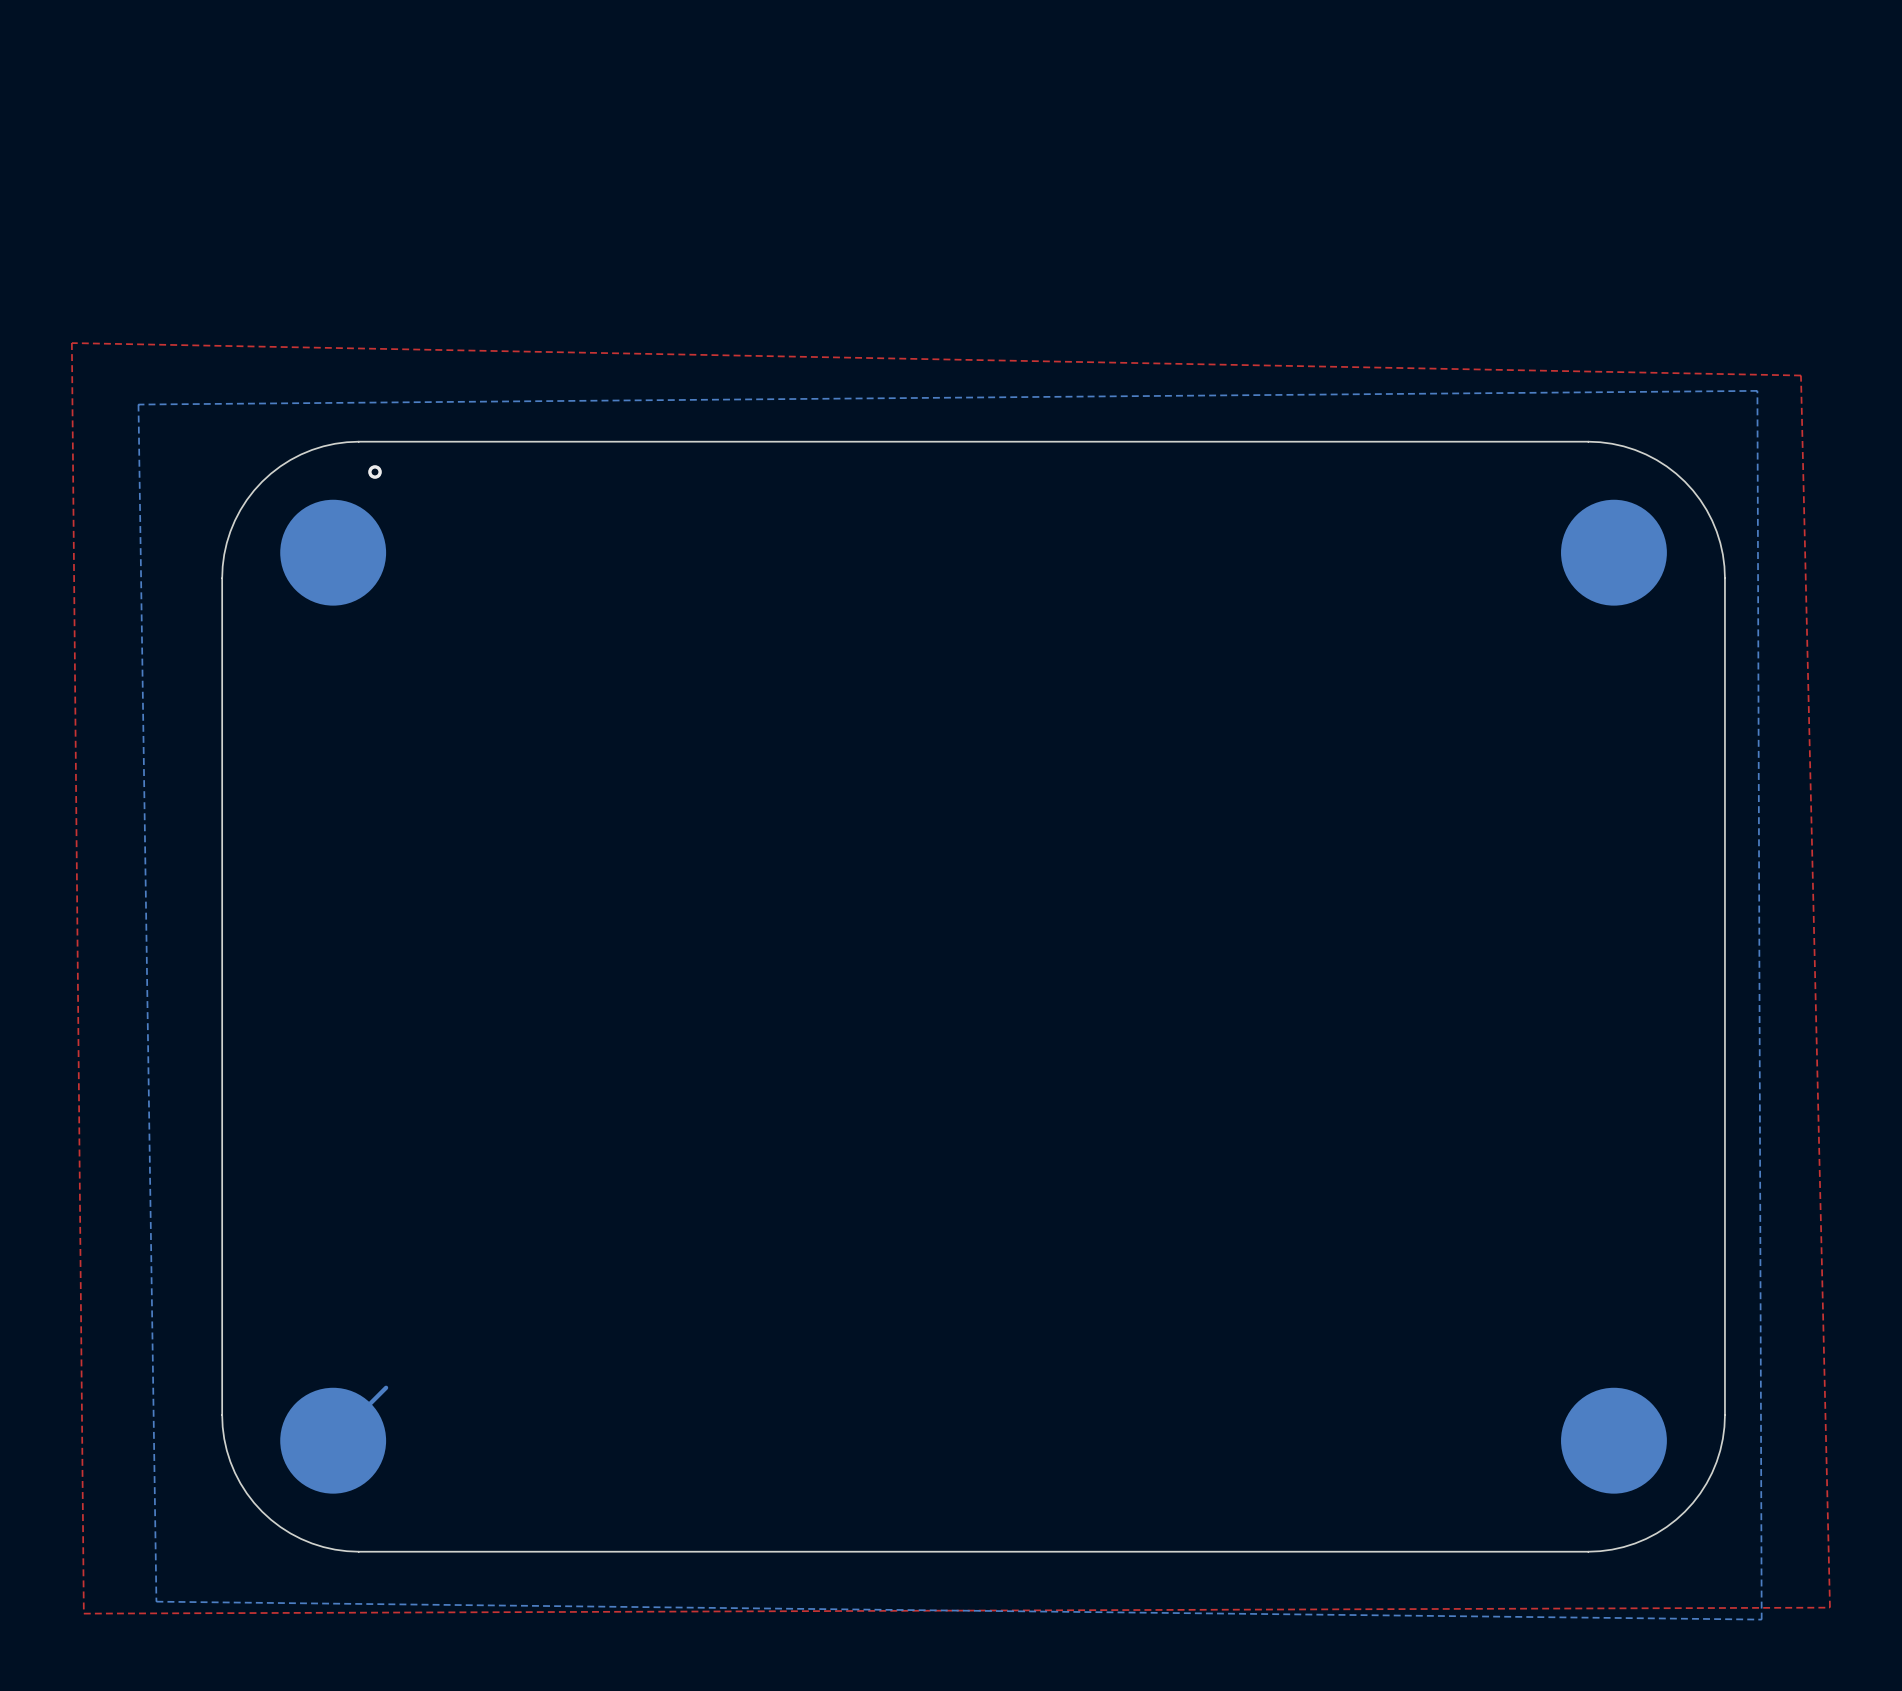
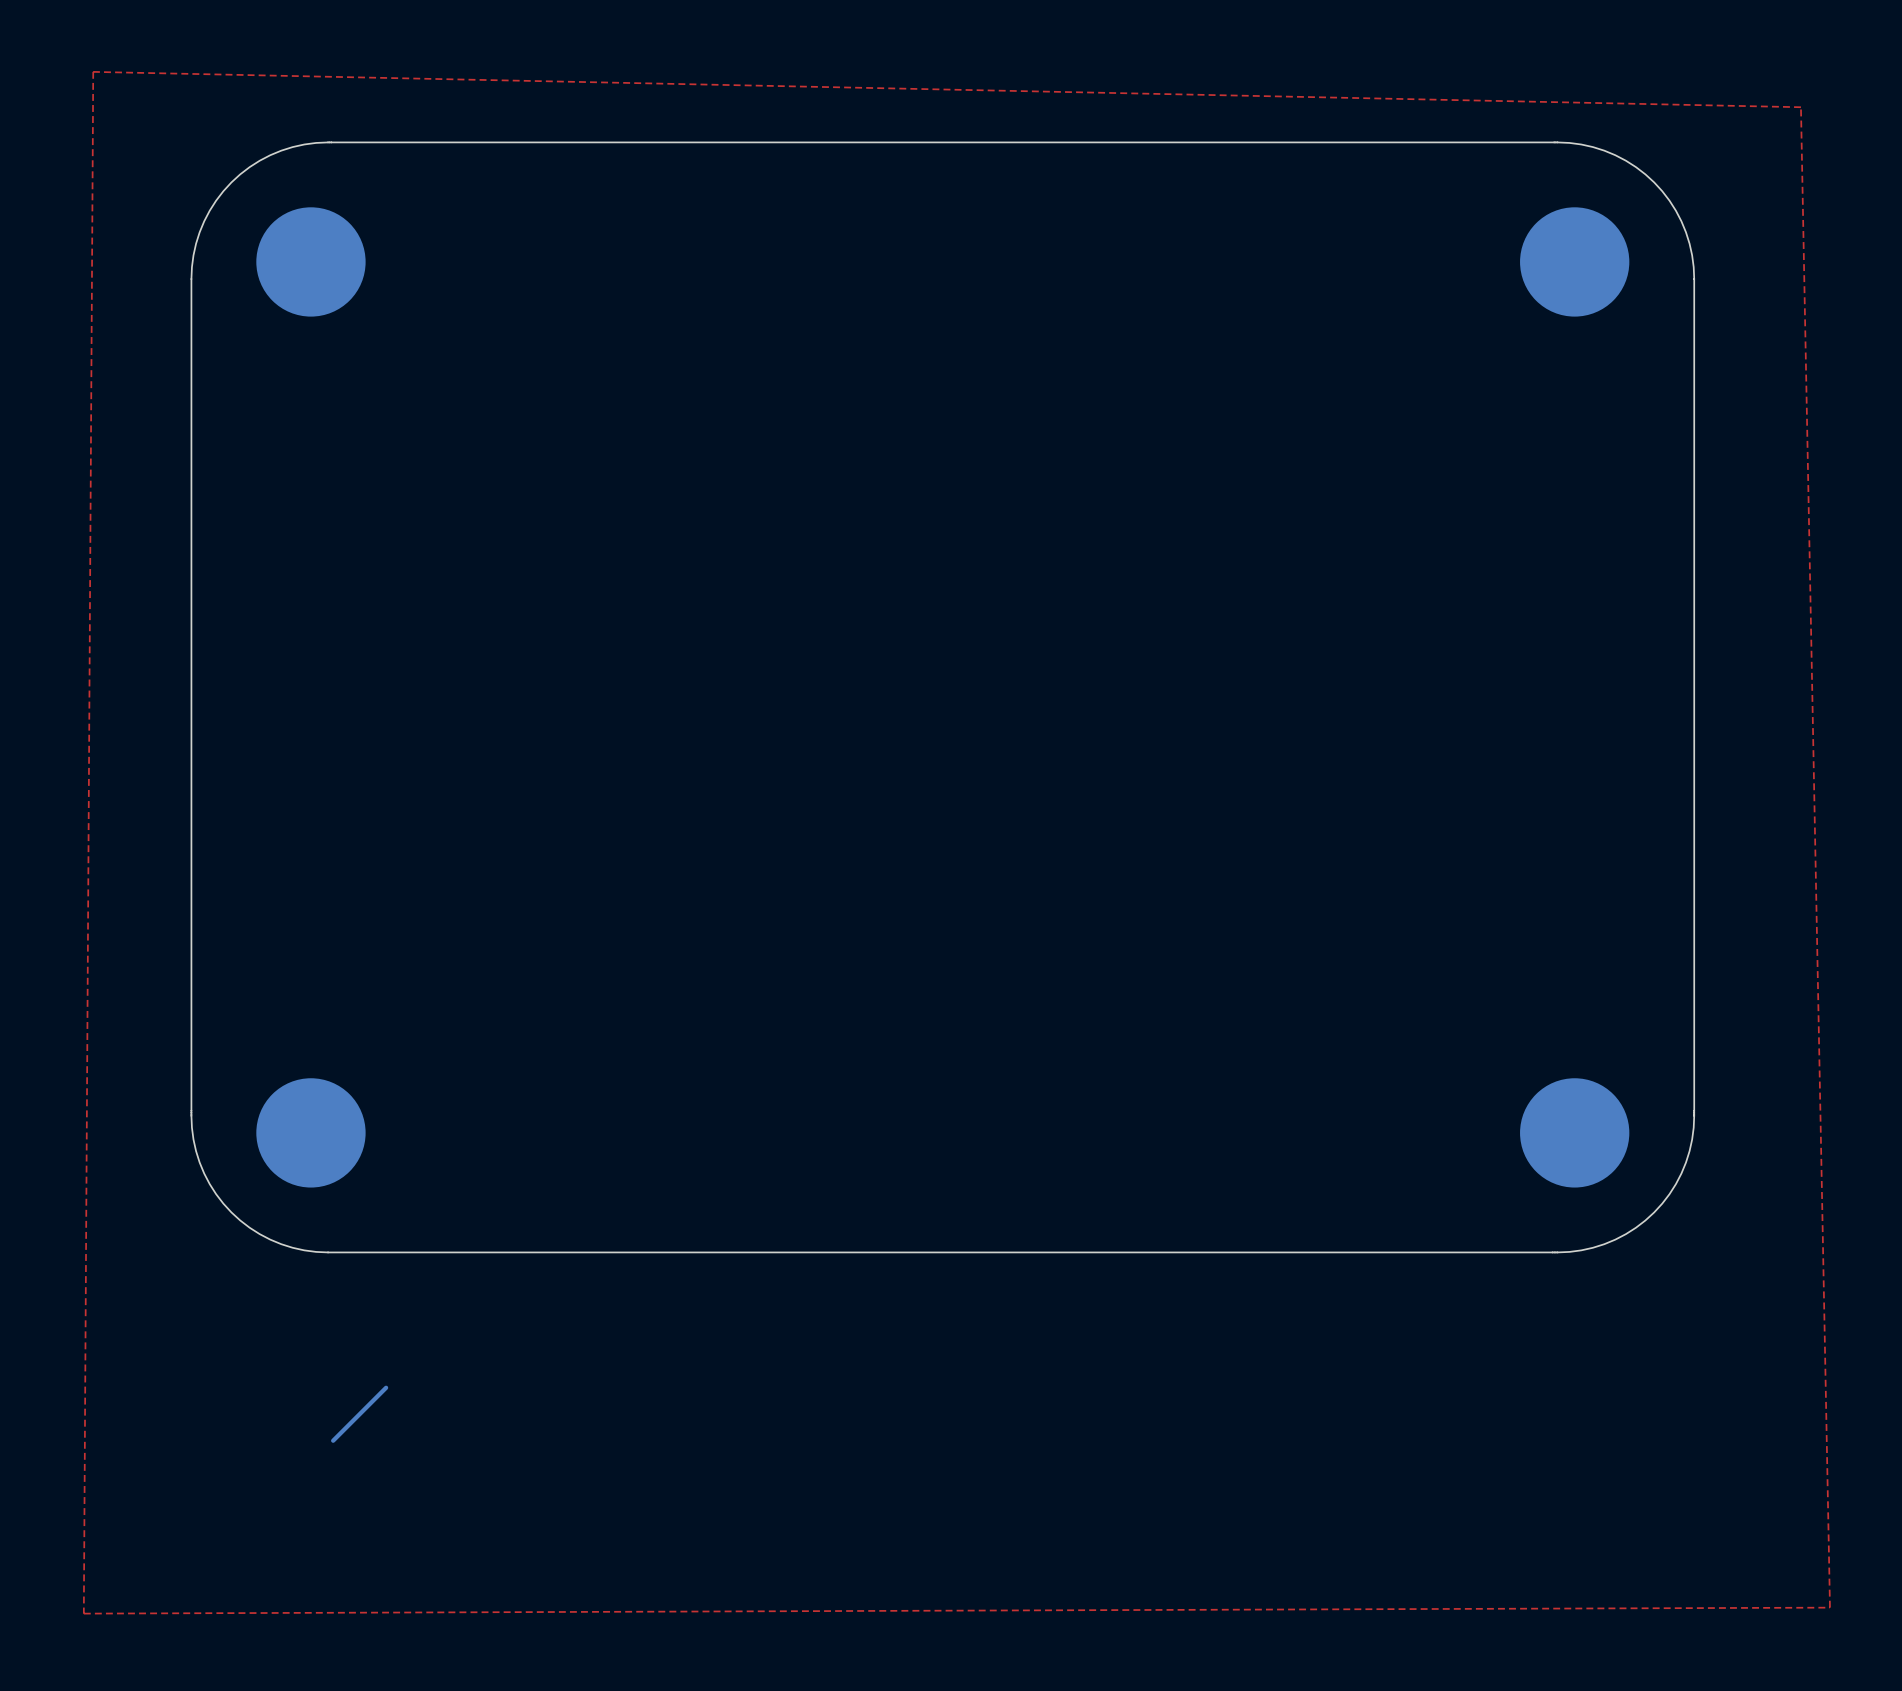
part: none -> (310, 261)
part: none -> (1574, 261)
bottom zone outline: (1757, 390) (1761, 1619) (156, 1601) (138, 404) (1757, 390) -> none
board edge: (1588, 441) (358, 441) (335, 443) (312, 449) (290, 459) (270, 473) (246, 499) (234, 520) (224, 554) (222, 578) (222, 1415) (224, 1438) (230, 1461) (240, 1483) (254, 1502) (280, 1527) (301, 1538) (335, 1549) (358, 1551) (1588, 1551) (1612, 1549) (1635, 1543) (1656, 1533) (1676, 1519) (1693, 1502) (1706, 1483) (1720, 1450) (1724, 1427) (1724, 566) (1716, 531) (1706, 510) (1693, 490) (1676, 473) (1656, 459) (1635, 449) (1612, 443) (1588, 441) -> (1557, 142) (328, 142) (304, 144) (281, 150) (259, 160) (240, 174) (216, 200) (204, 221) (193, 255) (191, 279) (191, 1115) (193, 1139) (199, 1162) (209, 1184) (223, 1203) (249, 1227) (270, 1239) (304, 1250) (328, 1252) (1557, 1252) (1581, 1250) (1604, 1244) (1625, 1234) (1645, 1220) (1669, 1194) (1681, 1173) (1689, 1151) (1693, 1127) (1693, 267) (1689, 243) (1681, 221) (1669, 200) (1654, 182) (1635, 167) (1604, 150) (1581, 144) (1557, 142)
via: (375, 472) -> none
part: (333, 552) -> none
part: (1613, 552) -> none
part: none -> (310, 1132)
part: none -> (1574, 1132)
part: (333, 1440) -> none
part: (1613, 1440) -> none
top zone outline: (1829, 1607) (1800, 375) (71, 343) (83, 1613) -> (1829, 1607) (1800, 107) (93, 71) (83, 1613)

